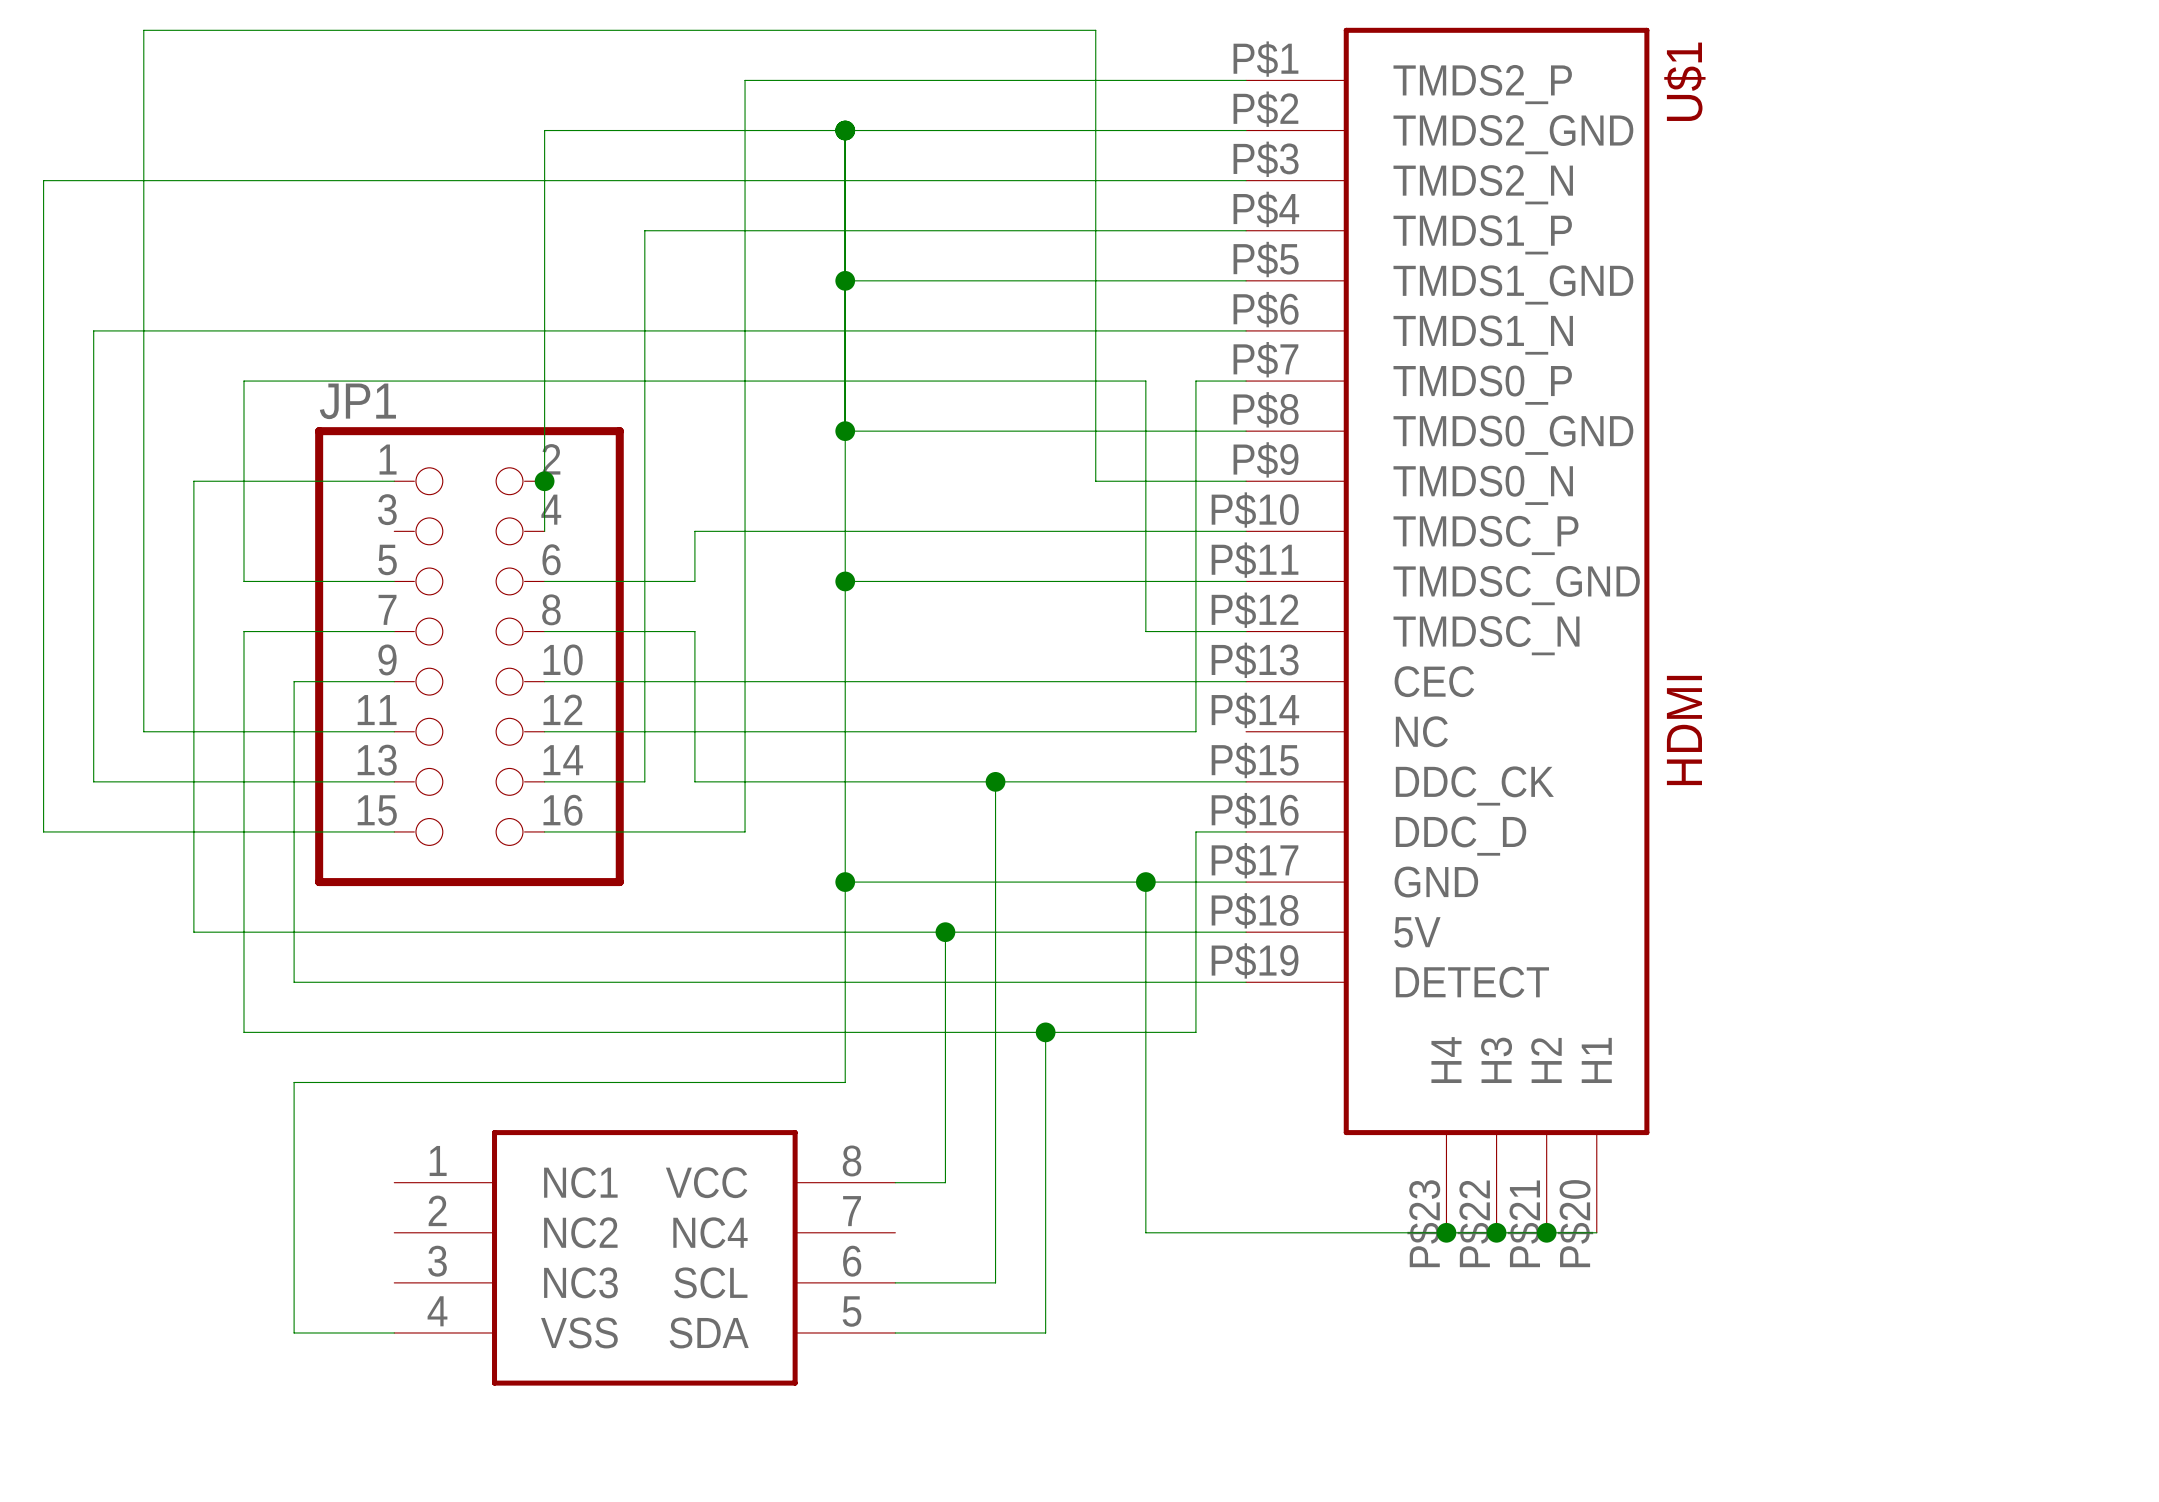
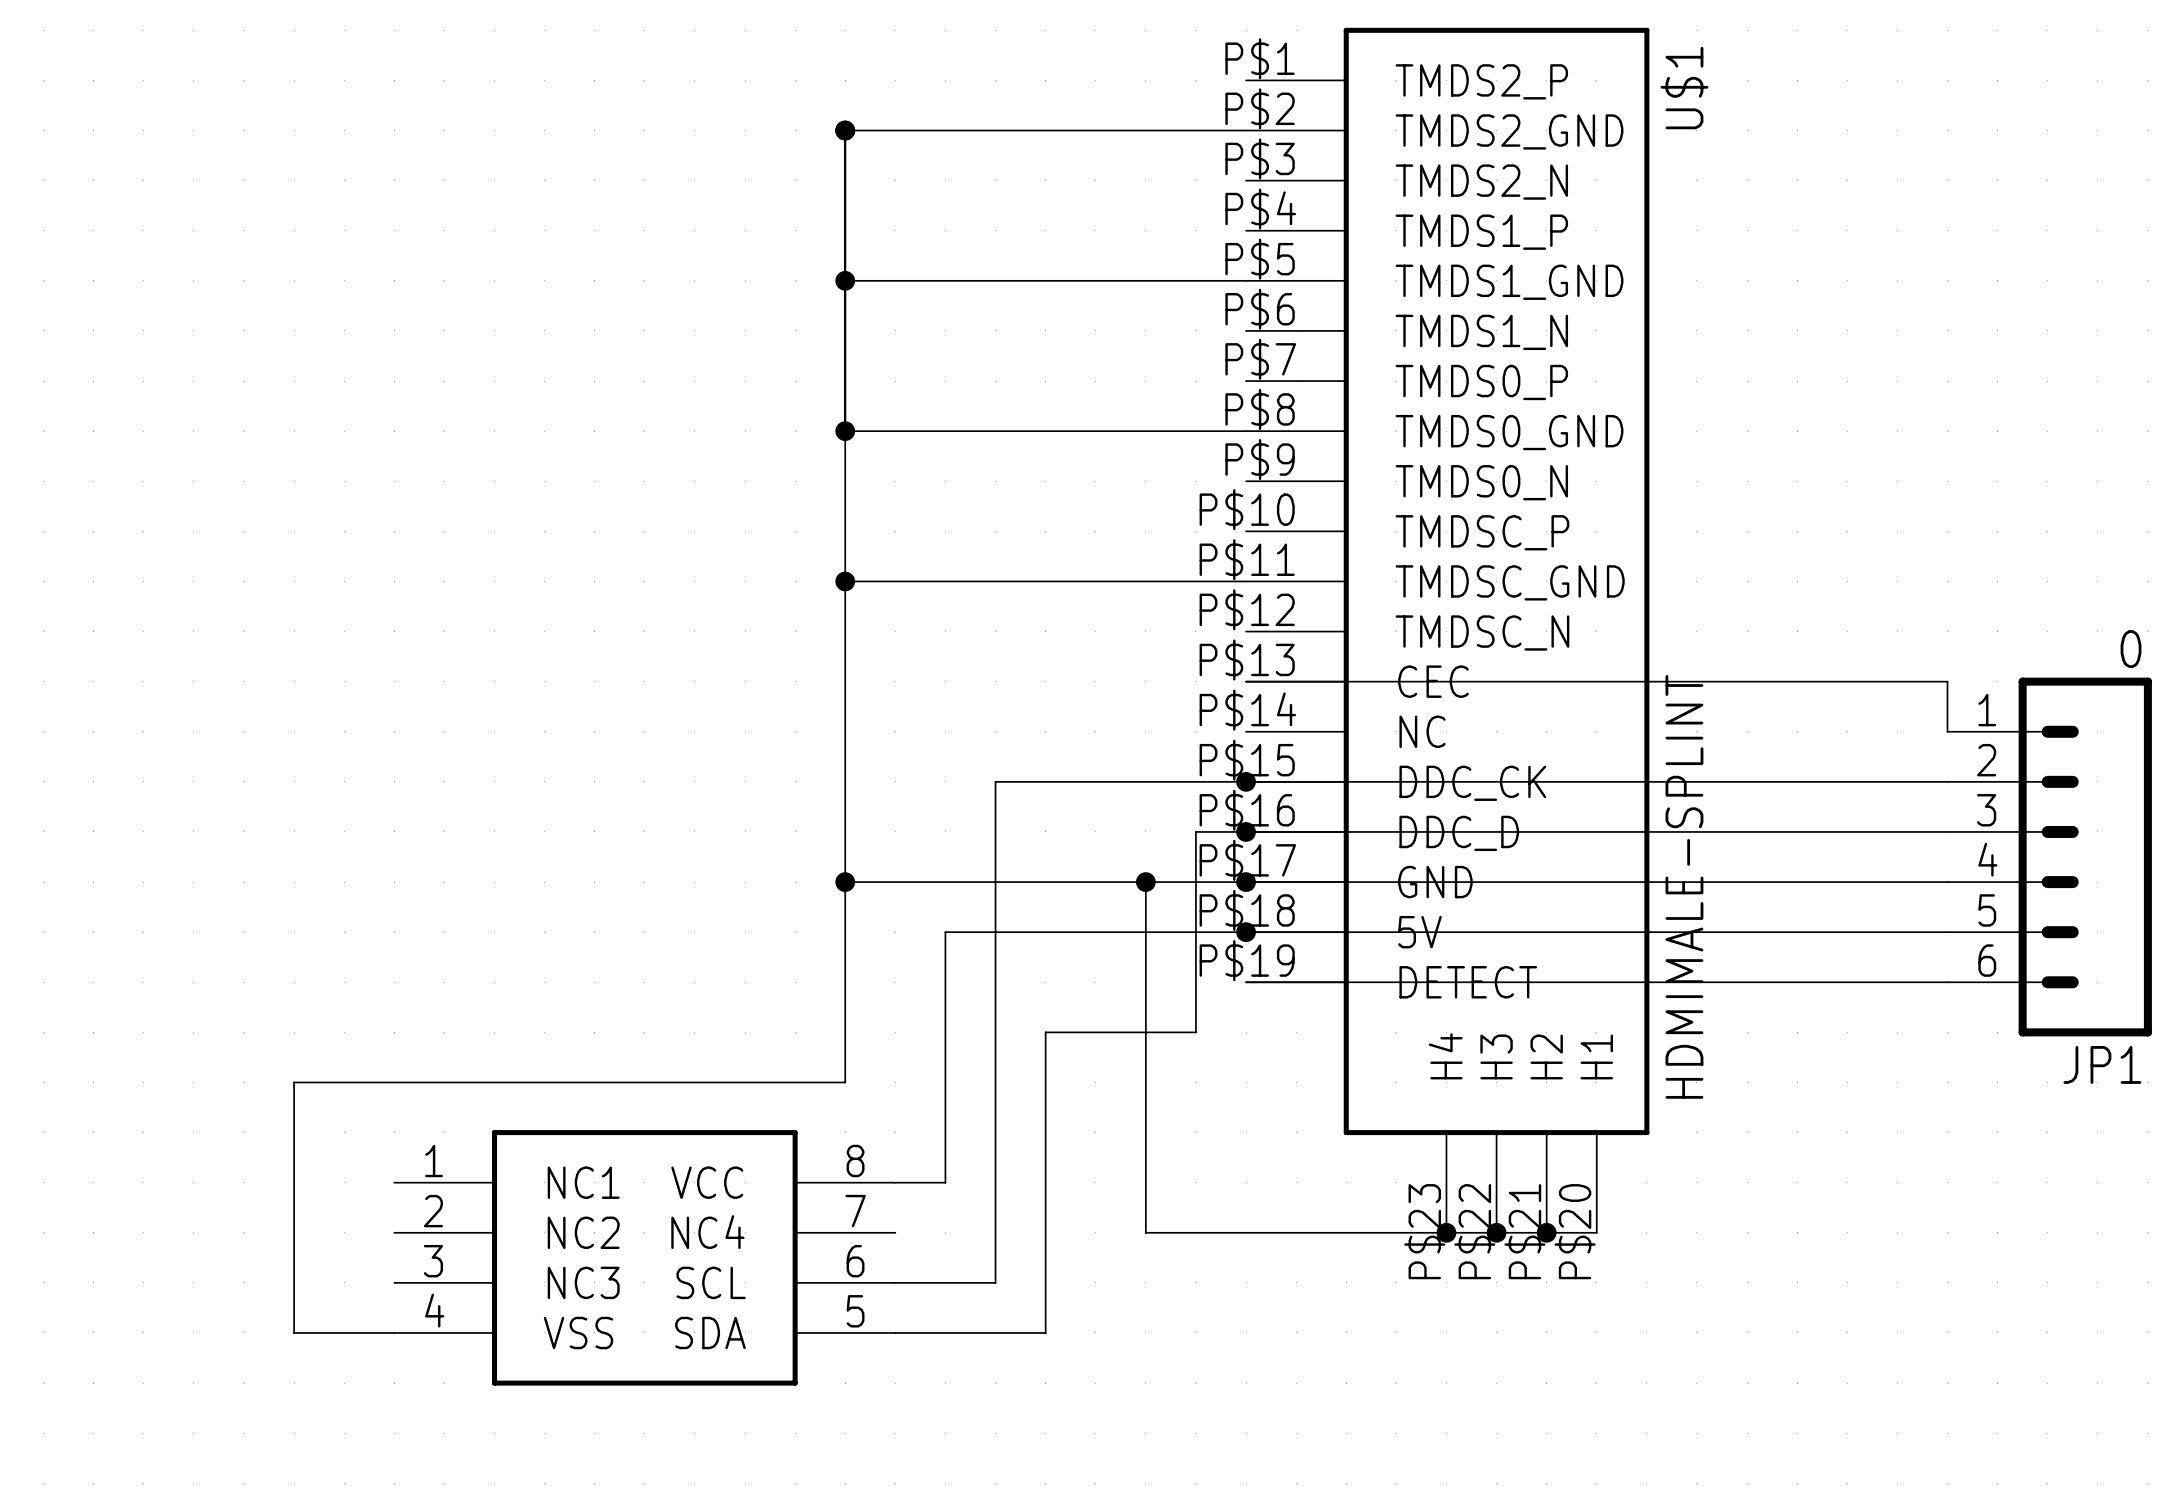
wire: (1246, 80) (745, 80) (745, 831) (544, 831) -> none
wire: (845, 130) (544, 130) (544, 531) -> none
wire: (1246, 180) (43, 180) (43, 831) (394, 831) -> none
wire: (1246, 230) (644, 230) (644, 781) (544, 781) -> none
wire: (1246, 330) (93, 330) (93, 781) (394, 781) -> none
wire: (1246, 381) (1195, 381) (1195, 731) (544, 731) -> none
JP1 name position: JP1 (357, 401) -> JP1 (2102, 1064)
JP1 symbol: [315, 427, 624, 887] -> [1947, 677, 2152, 1037]
wire: (394, 481) (193, 481) (193, 932) (945, 932) -> none
junction: (544, 481) -> none
wire: (1246, 481) (1095, 481) (1095, 30) (143, 30) (143, 731) (394, 731) -> none
wire: (1246, 531) (694, 531) (694, 581) (544, 581) -> none
wire: (394, 581) (243, 581) (243, 381) (1145, 381) (1145, 631) (1246, 631) -> none
wire: (394, 631) (243, 631) (243, 1032) (1045, 1032) -> none
wire: (544, 631) (694, 631) (694, 781) (995, 781) -> none
JP1 value: none -> 0 (2131, 649)
wire: (394, 681) (294, 681) (294, 982) (1246, 982) -> (1947, 982) (1246, 982)
wire: (544, 681) (1246, 681) -> (1947, 731) (1947, 681) (1246, 681)
U$1 value: HDMI (1684, 730) -> HDMIMALE-SPLINT (1684, 886)
junction: (995, 781) -> none
wire: none -> (1246, 781) (1947, 781)
junction: none -> (1246, 781)
wire: none -> (1246, 831) (1947, 831)
junction: none -> (1246, 831)
wire: none -> (1246, 882) (1947, 882)
junction: none -> (1246, 882)
junction: (945, 932) -> none
wire: none -> (1246, 932) (1947, 932)
junction: none -> (1246, 932)
junction: (1045, 1032) -> none

